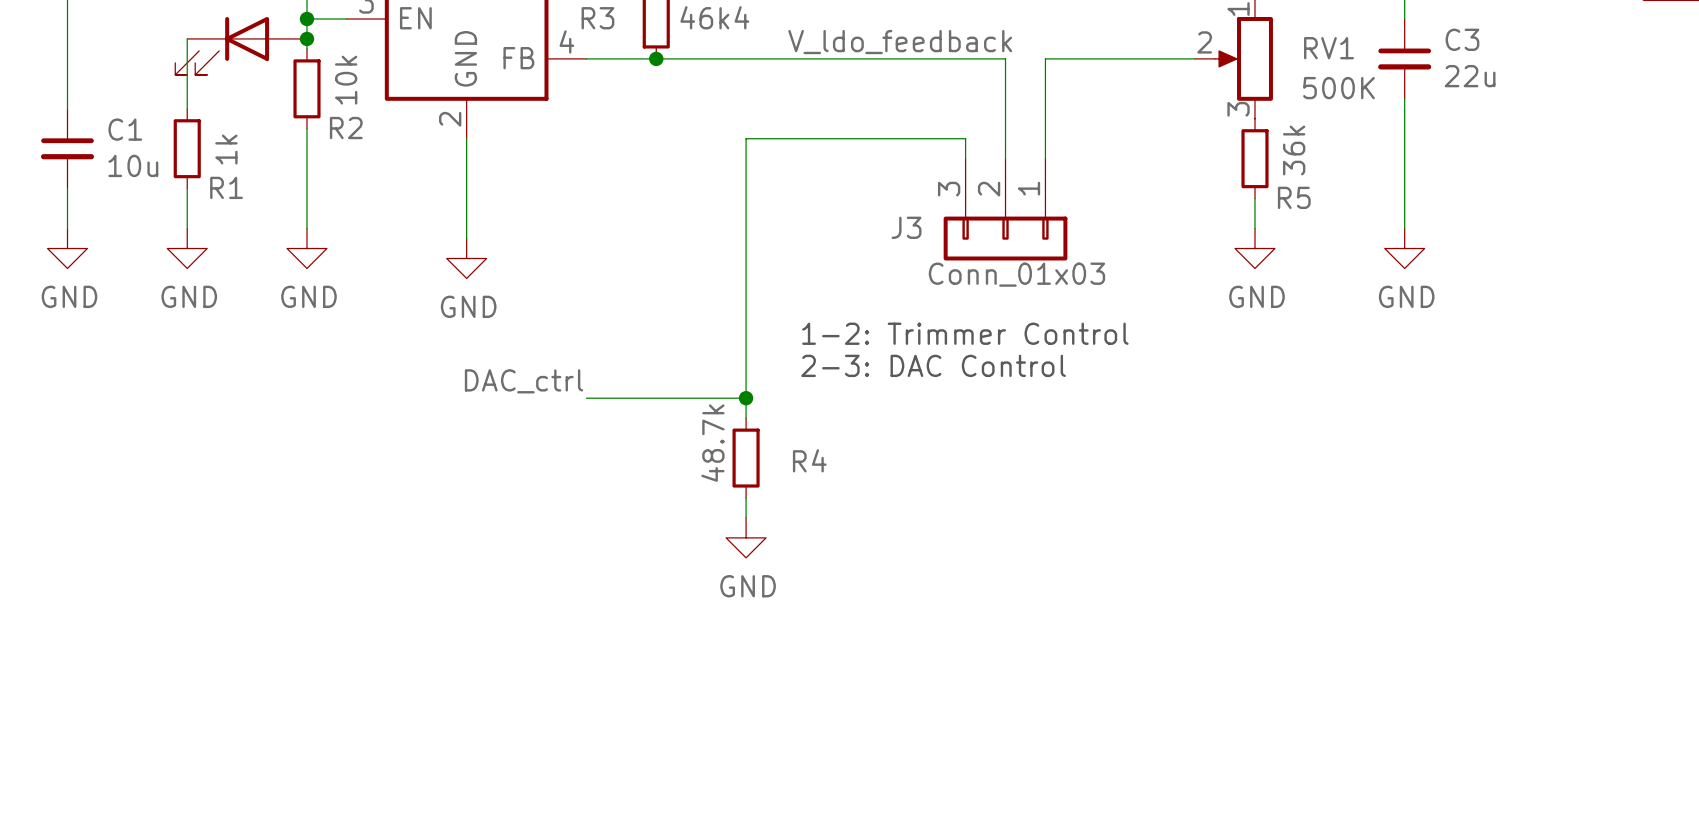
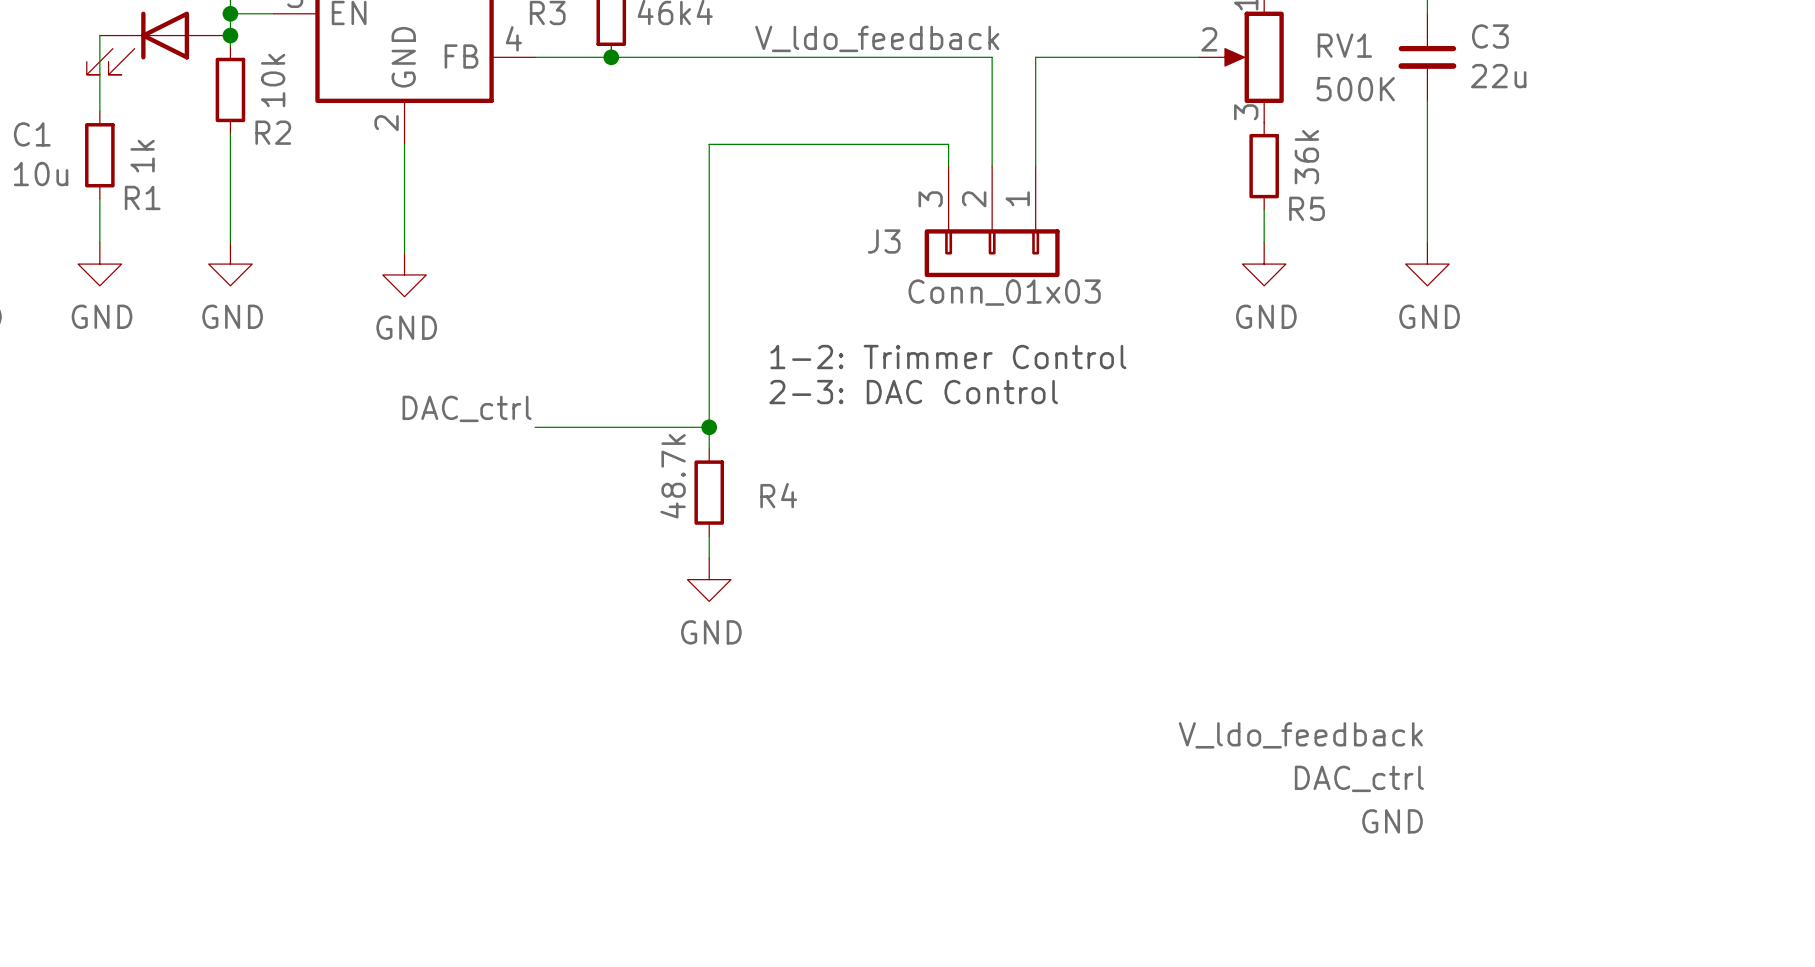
label: none -> V_ldo_feedback (1300, 735)
label: none -> DAC_ctrl (1359, 778)
label: none -> GND (1392, 821)

